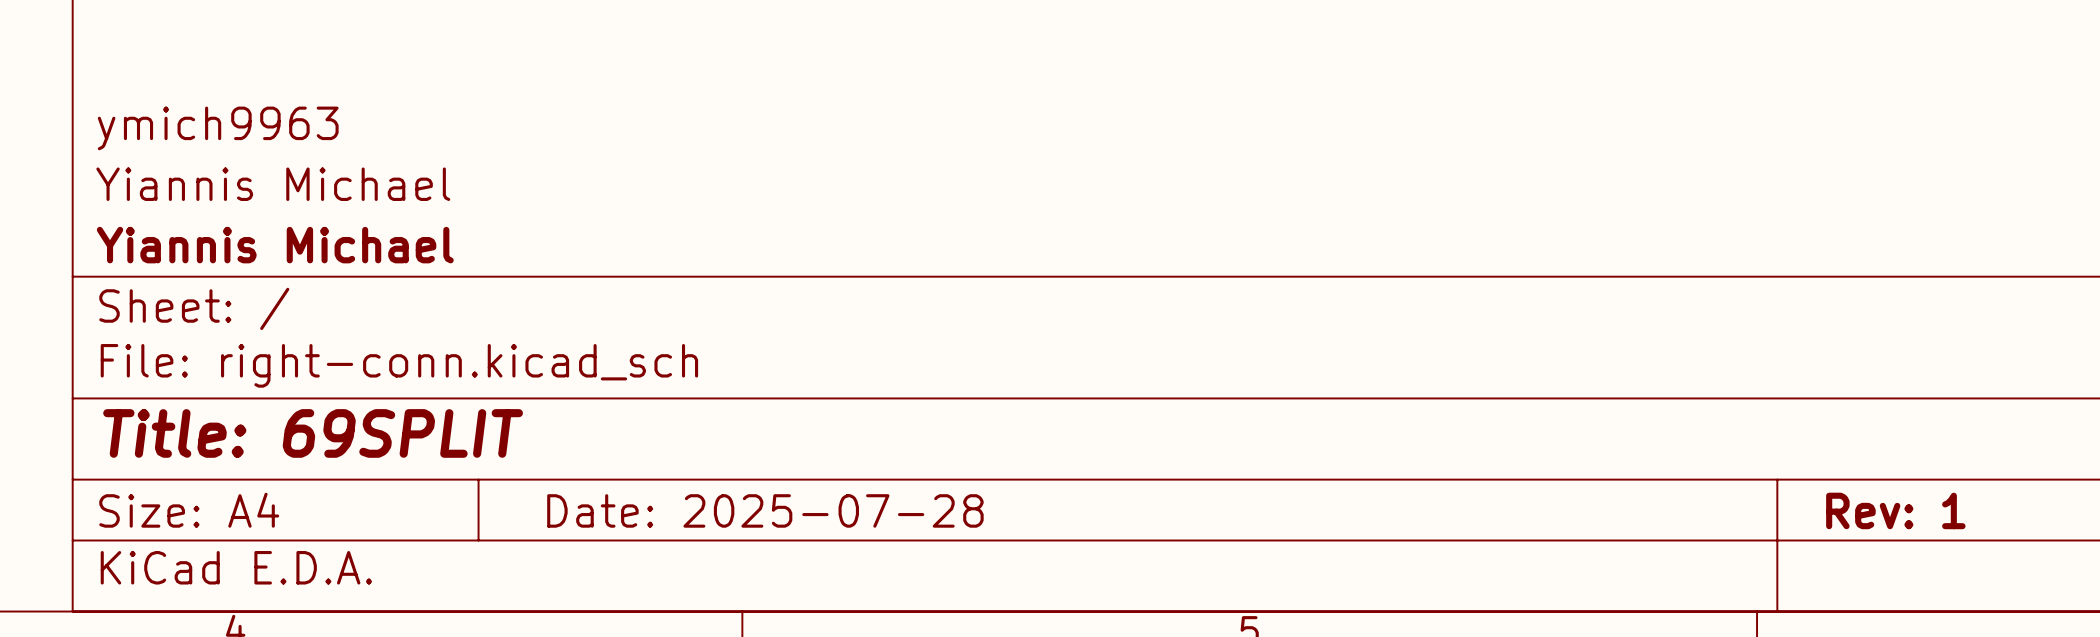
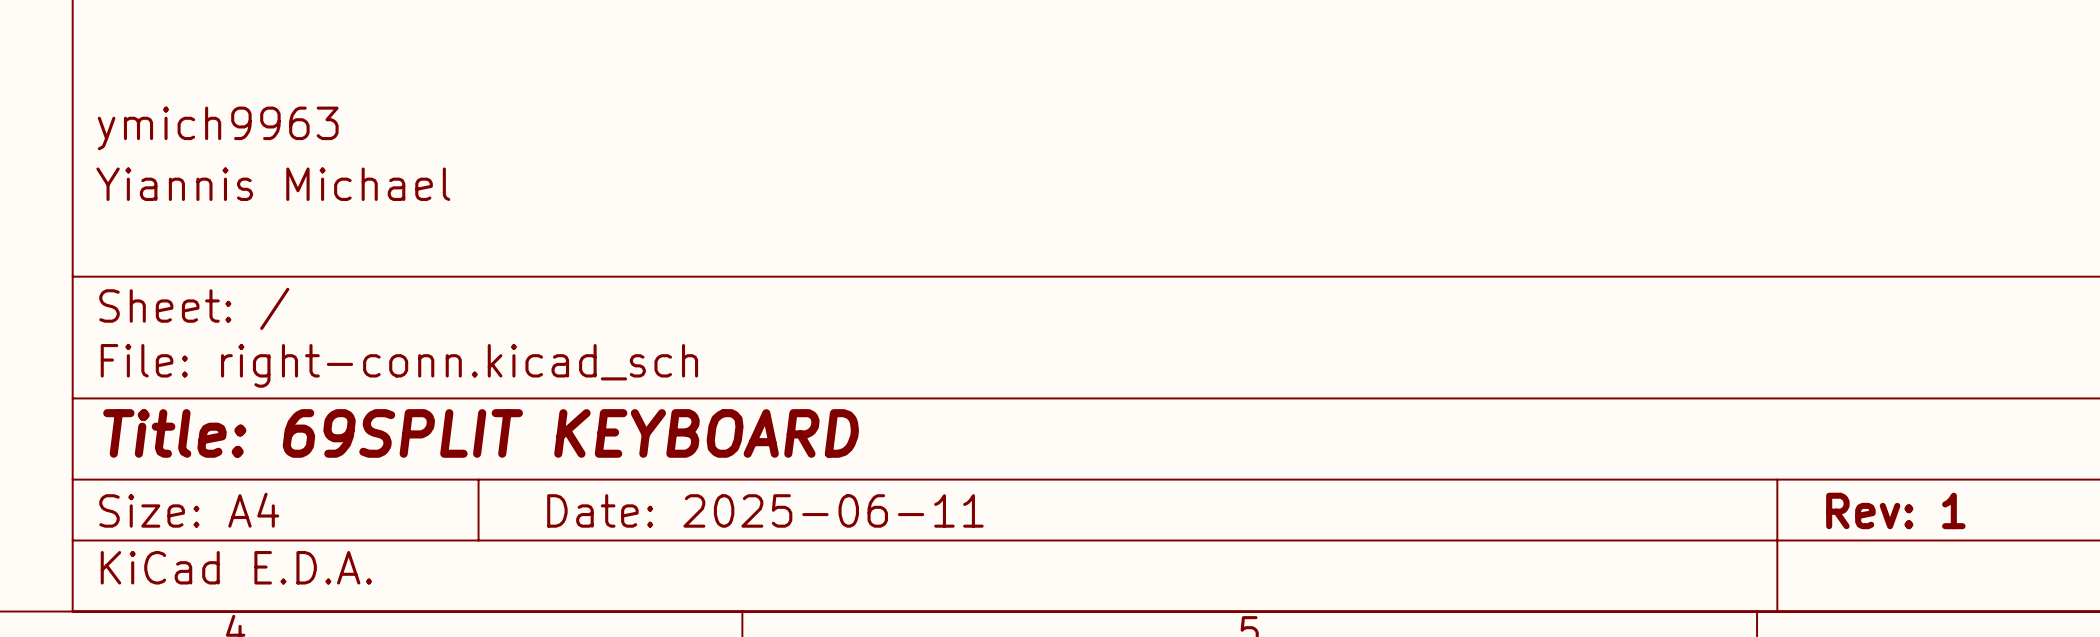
title block: Yiannis Michael (275, 245) -> none
title block: Title: 69SPLIT (313, 433) -> Title: 69SPLIT KEYBOARD (481, 433)
title block: Date: 2025-07-28 (765, 510) -> Date: 2025-06-11 (765, 510)

